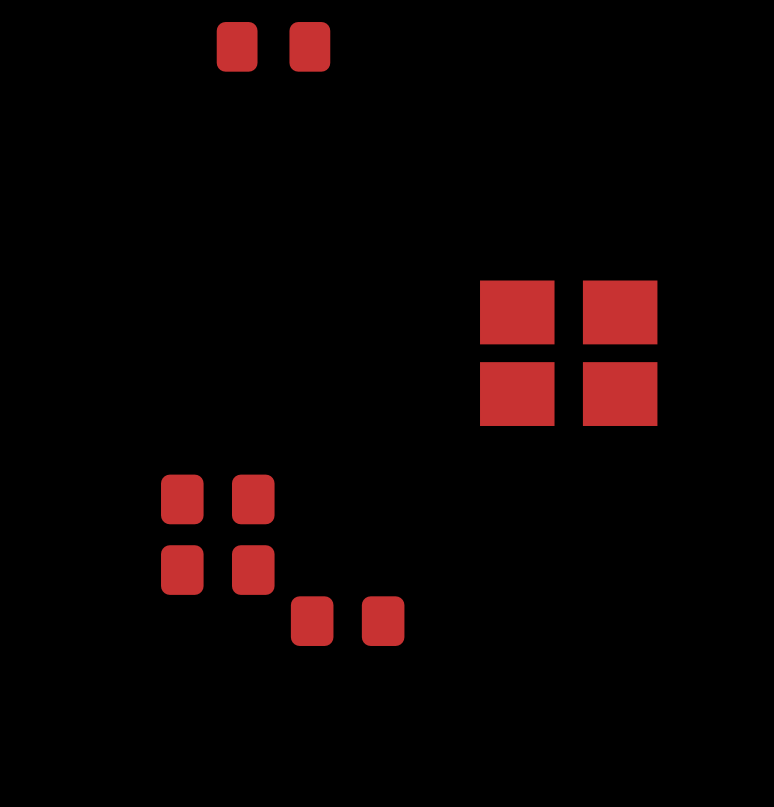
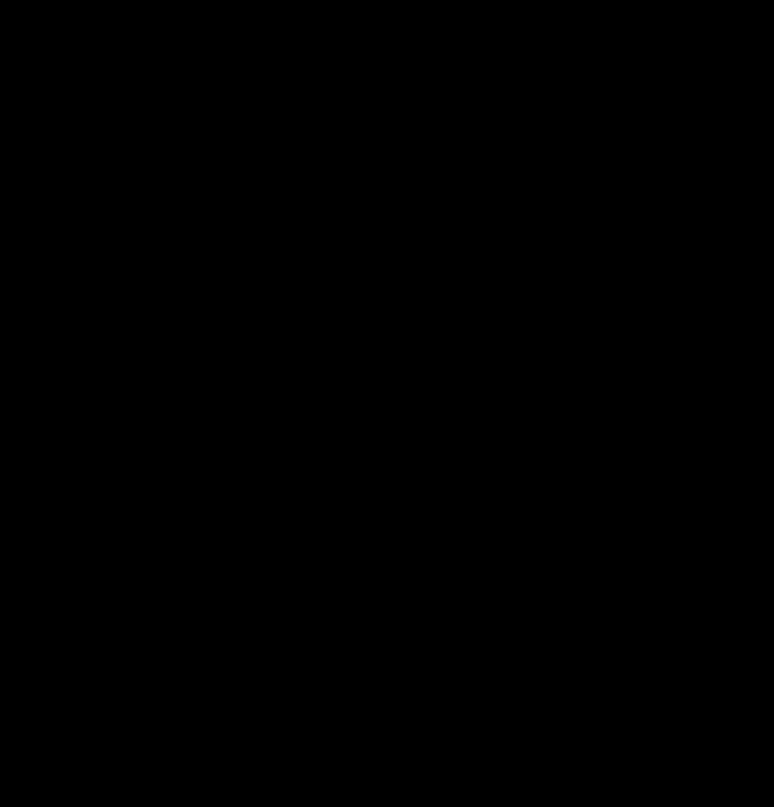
part: (273, 46) -> none
part: (568, 353) -> none
part: (217, 499) -> none
part: (217, 570) -> none
part: (347, 621) -> none

